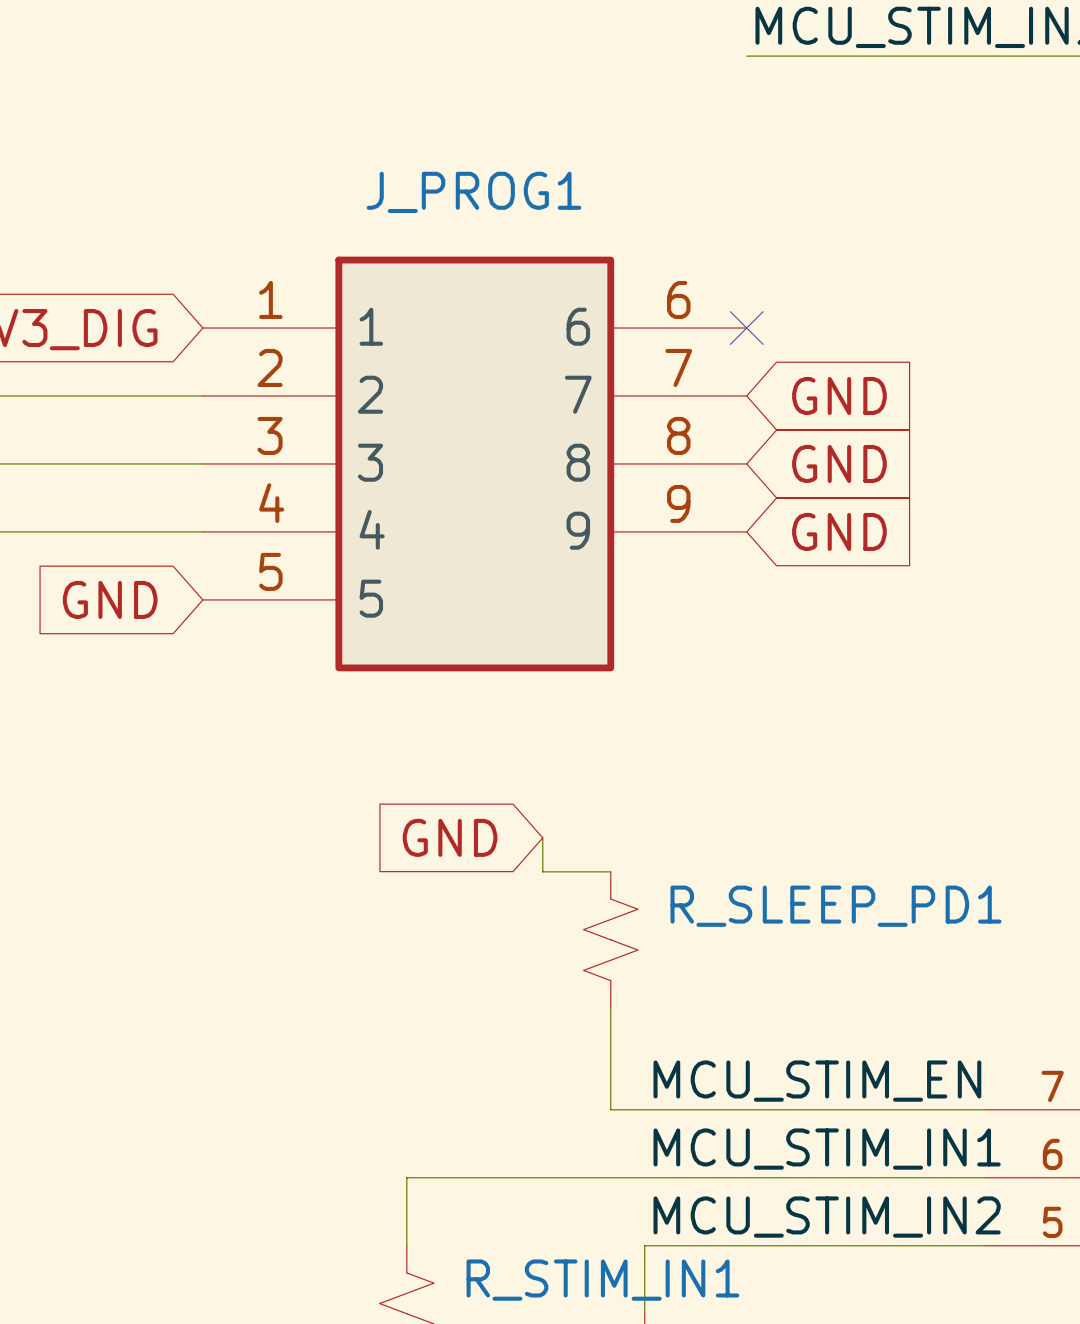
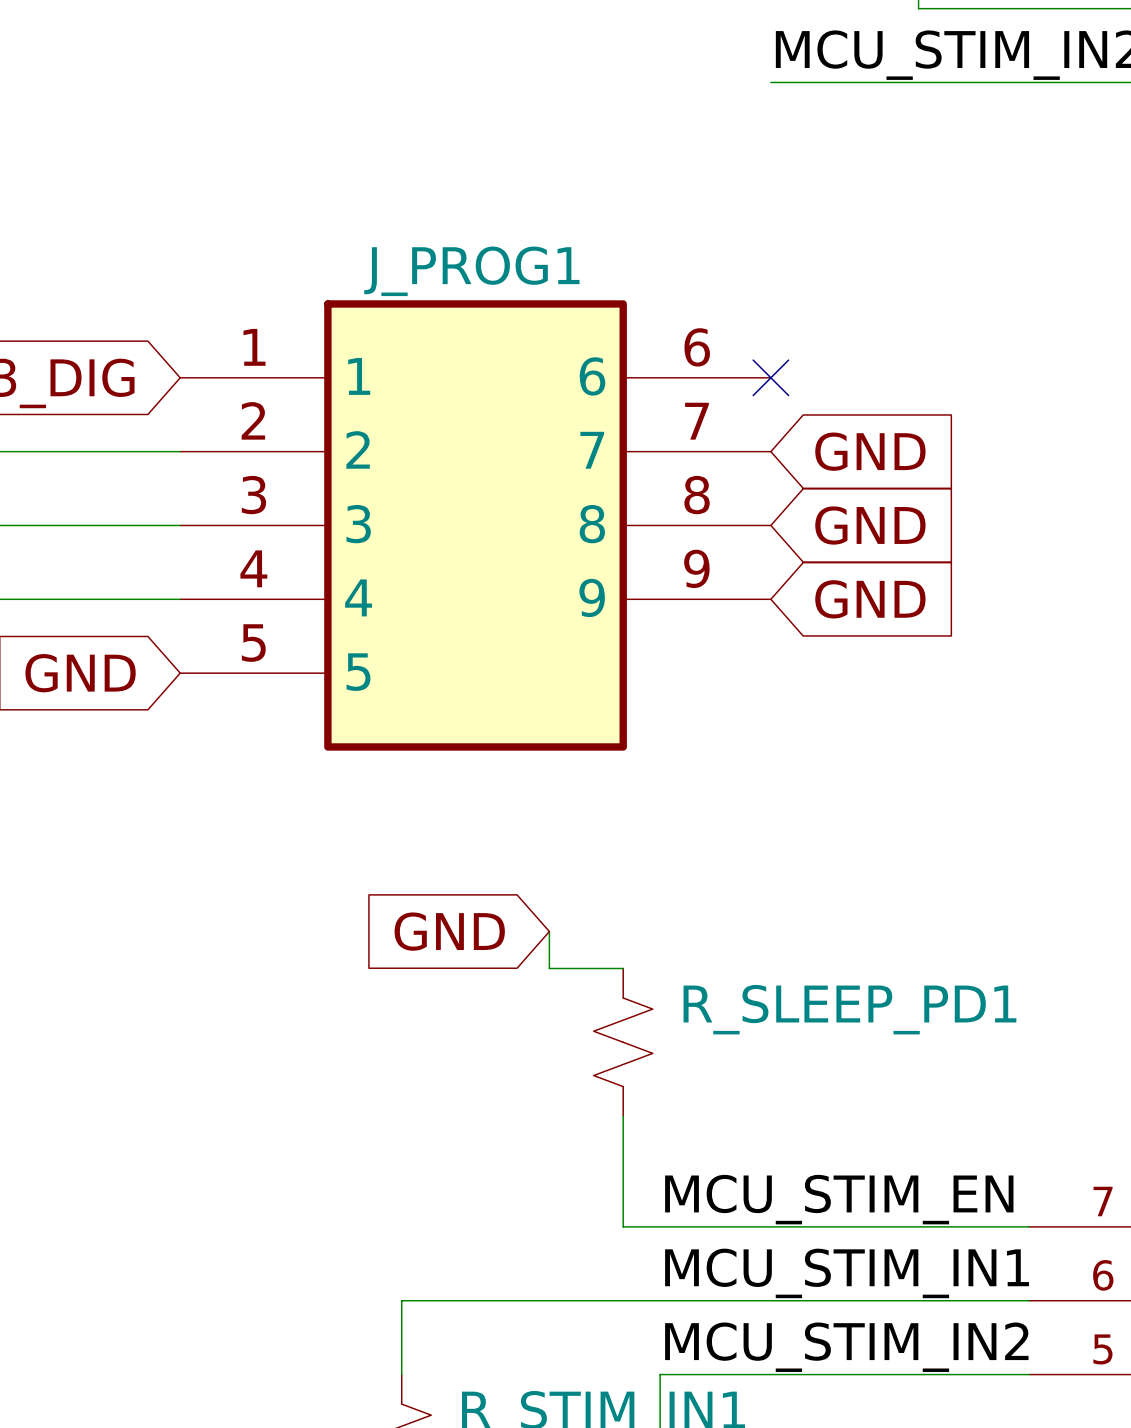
J_PROG1 name position: J_PROG1 (473, 192) -> J_PROG1 (471, 271)

